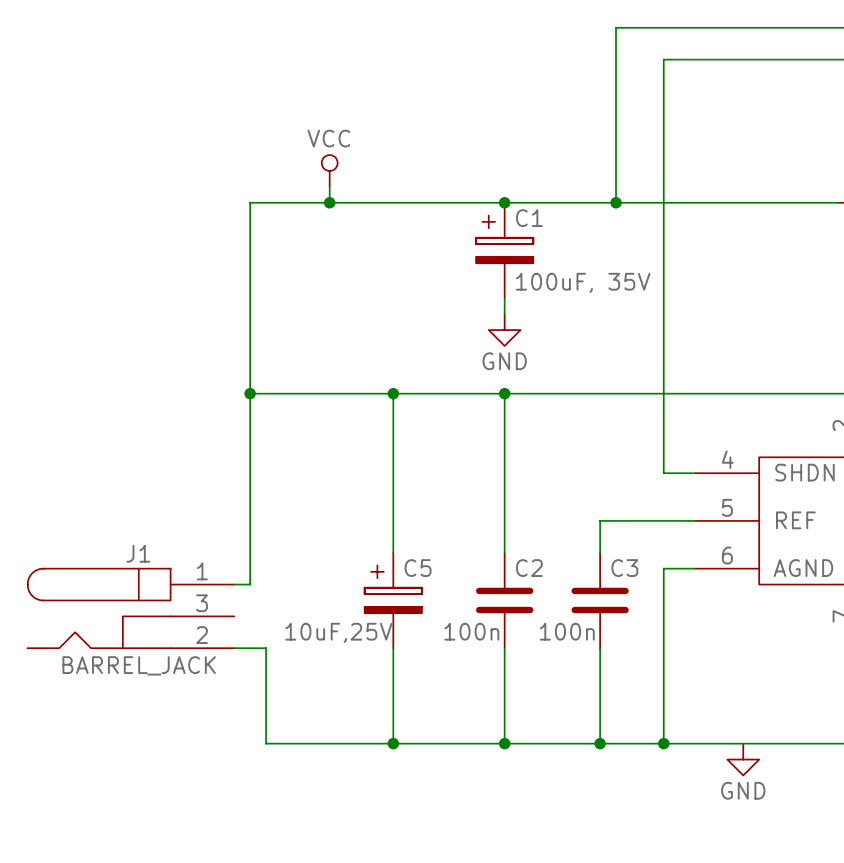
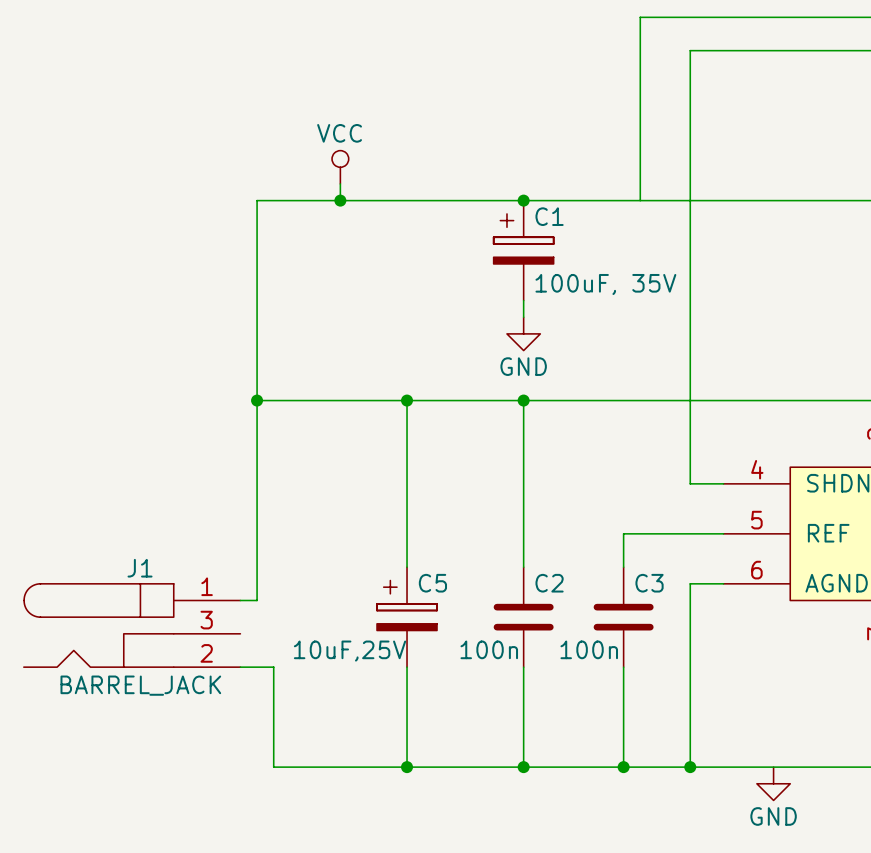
junction: (616, 202) -> none

